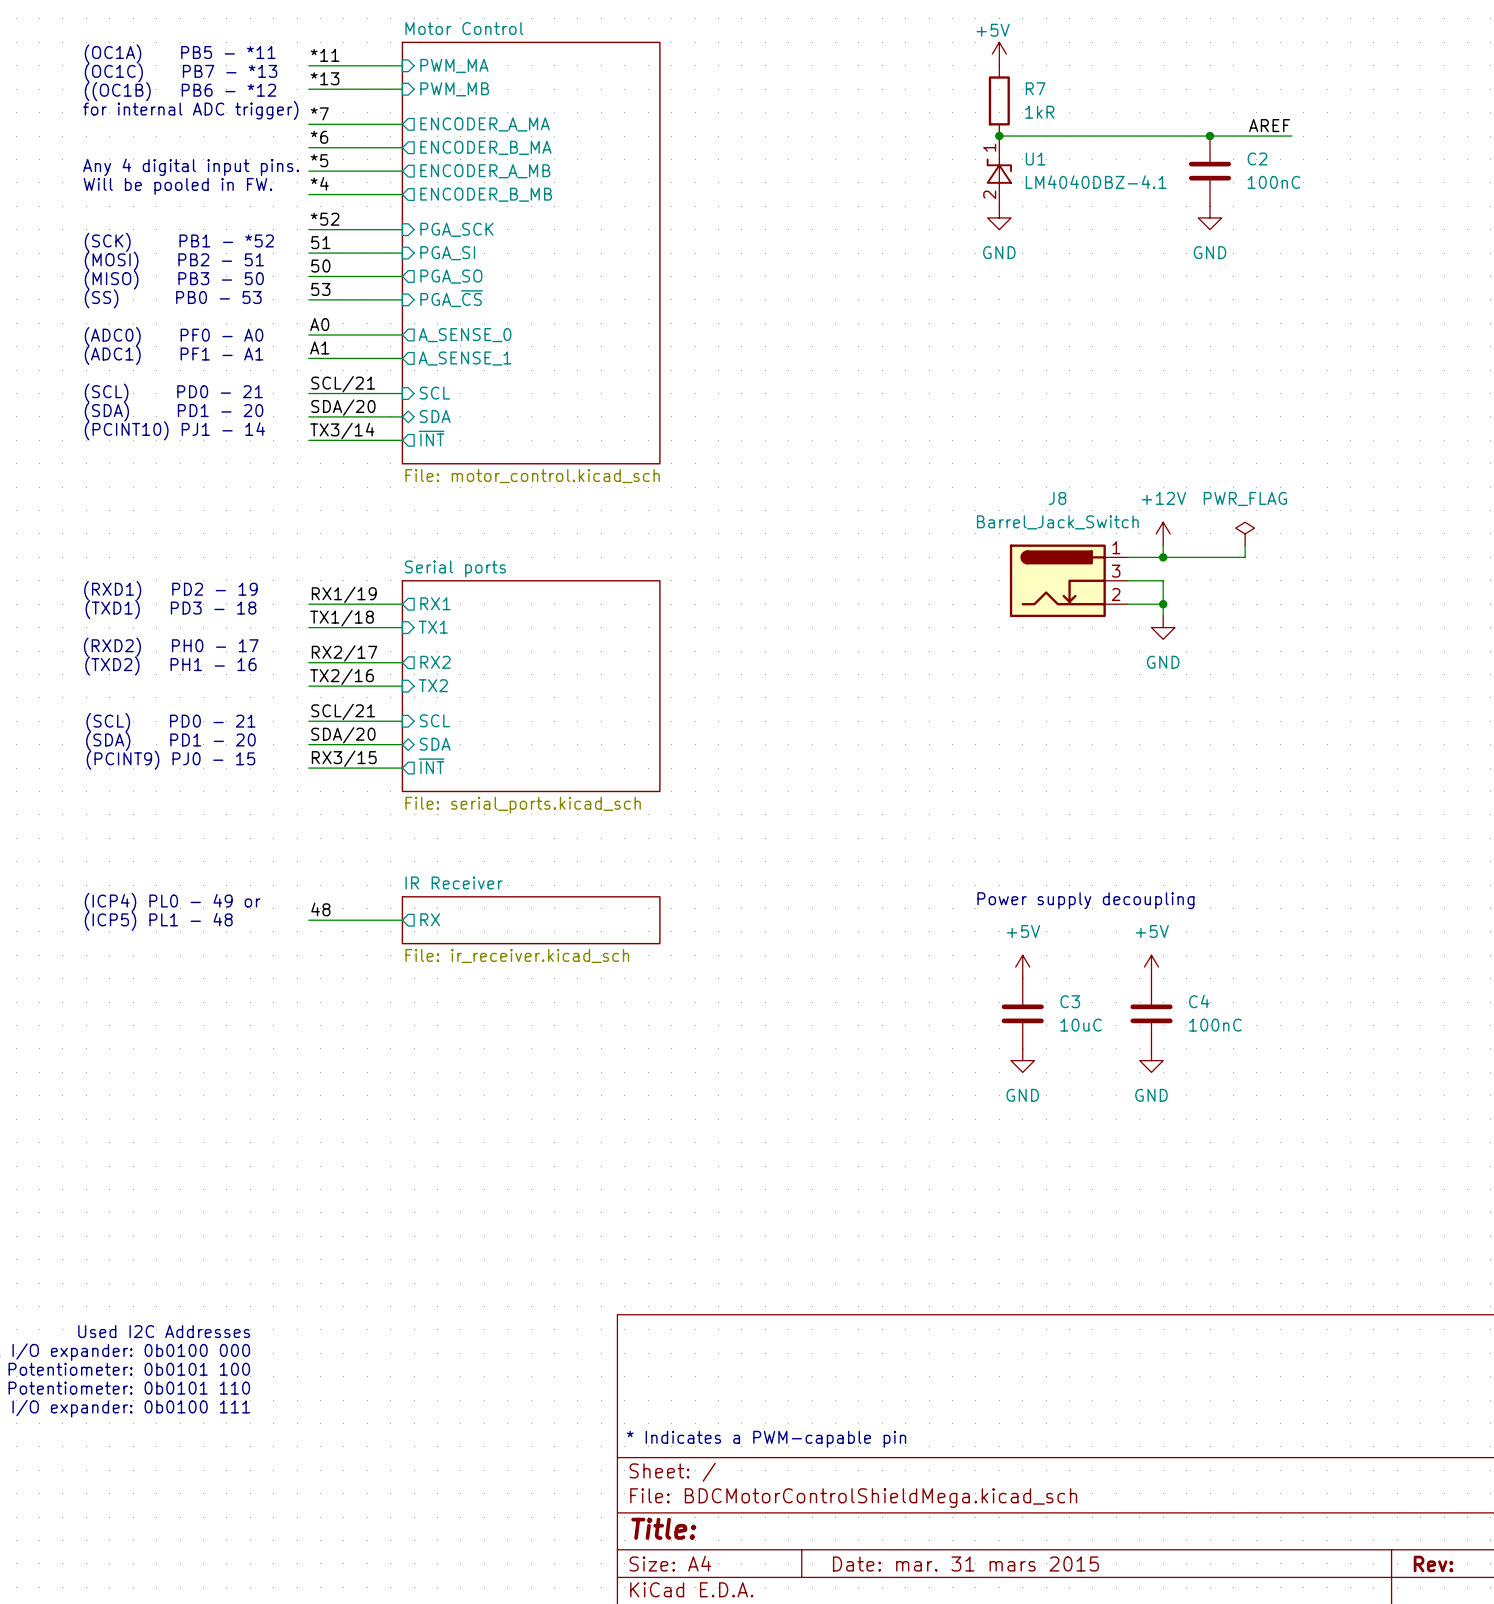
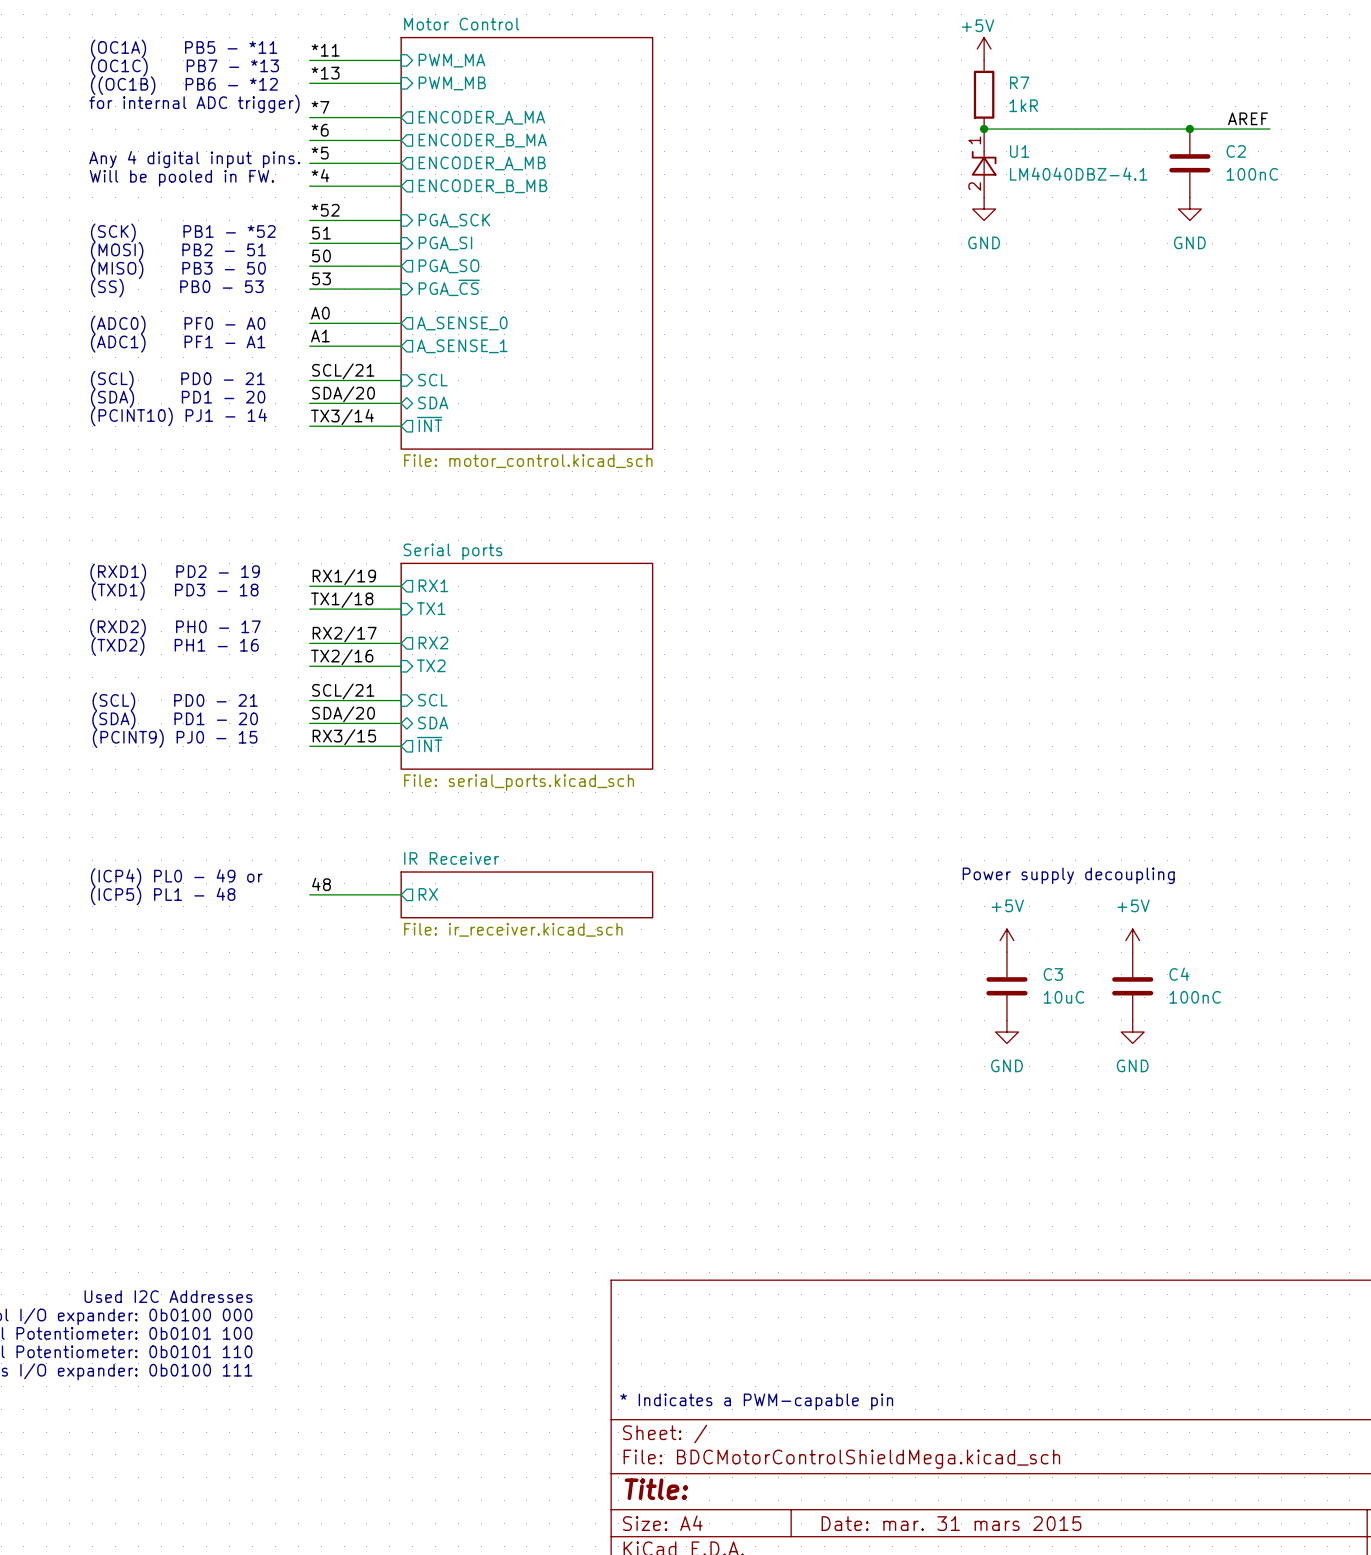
power symbol: +12V (1163, 533) -> none
power symbol: PWR_FLAG (1245, 533) -> none
wire: (1163, 545) (1163, 557) -> none
wire: (1245, 545) (1245, 557) (1128, 557) -> none
junction: (1163, 557) -> none
J8: Barrel_Jack_Switch (1068, 580) -> none
wire: (1128, 580) (1163, 580) (1163, 615) -> none
wire: (1128, 604) (1163, 604) -> none
junction: (1163, 604) -> none
power symbol: GND (1163, 627) -> none

